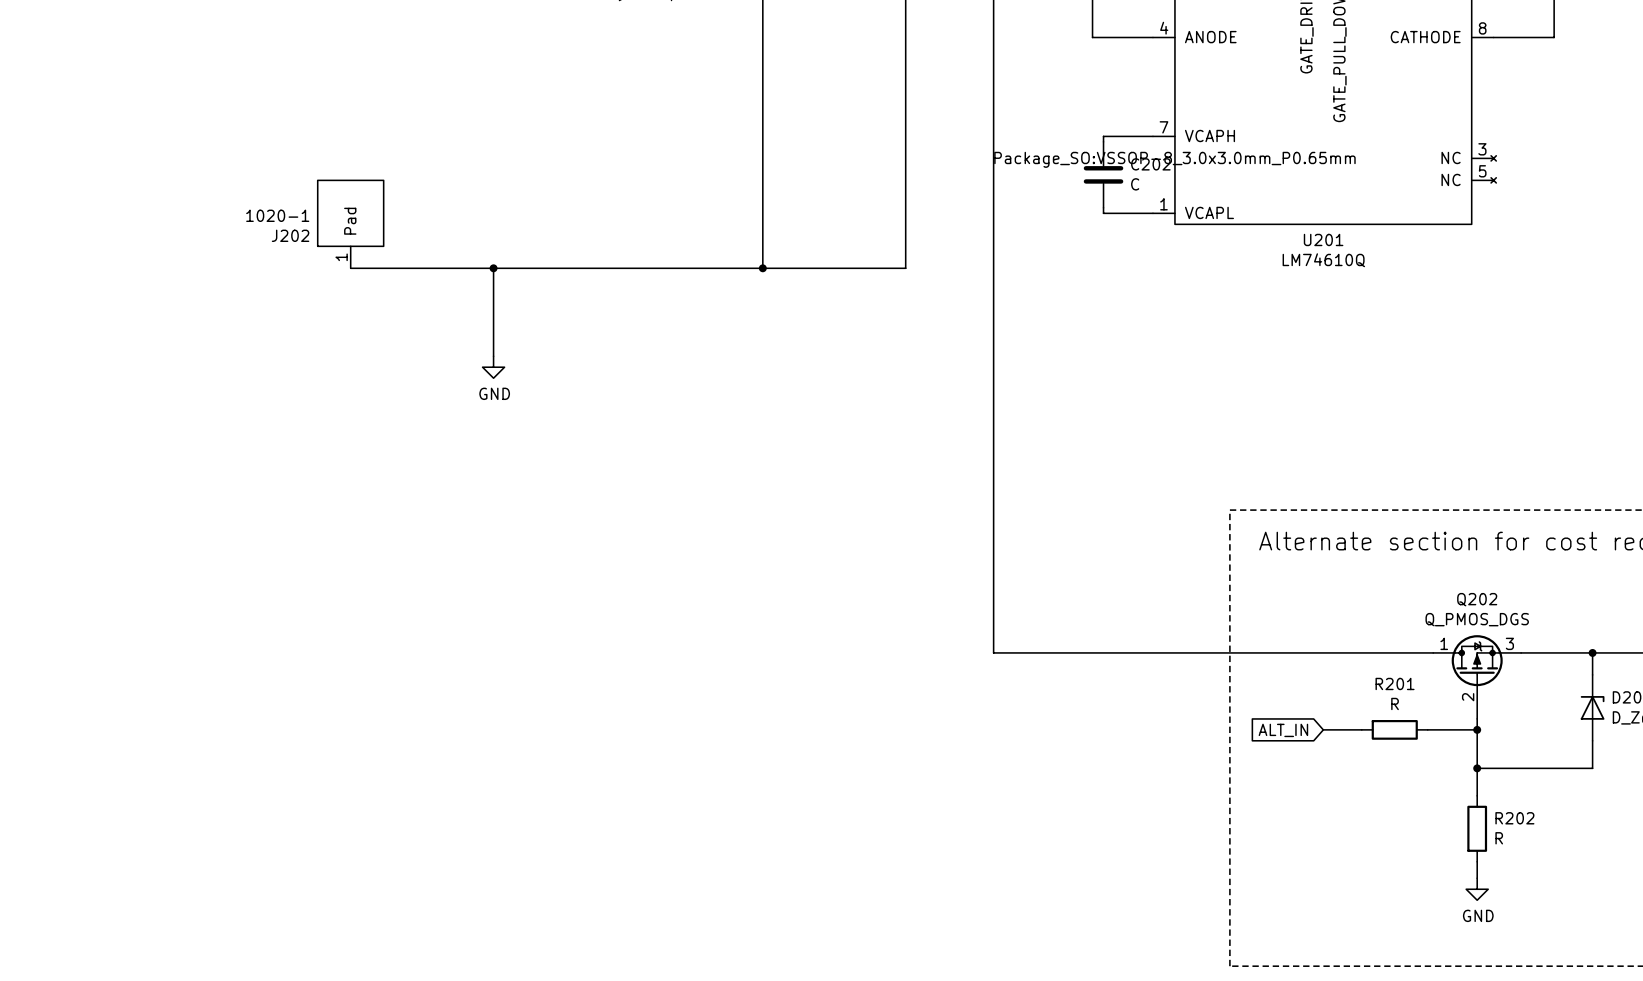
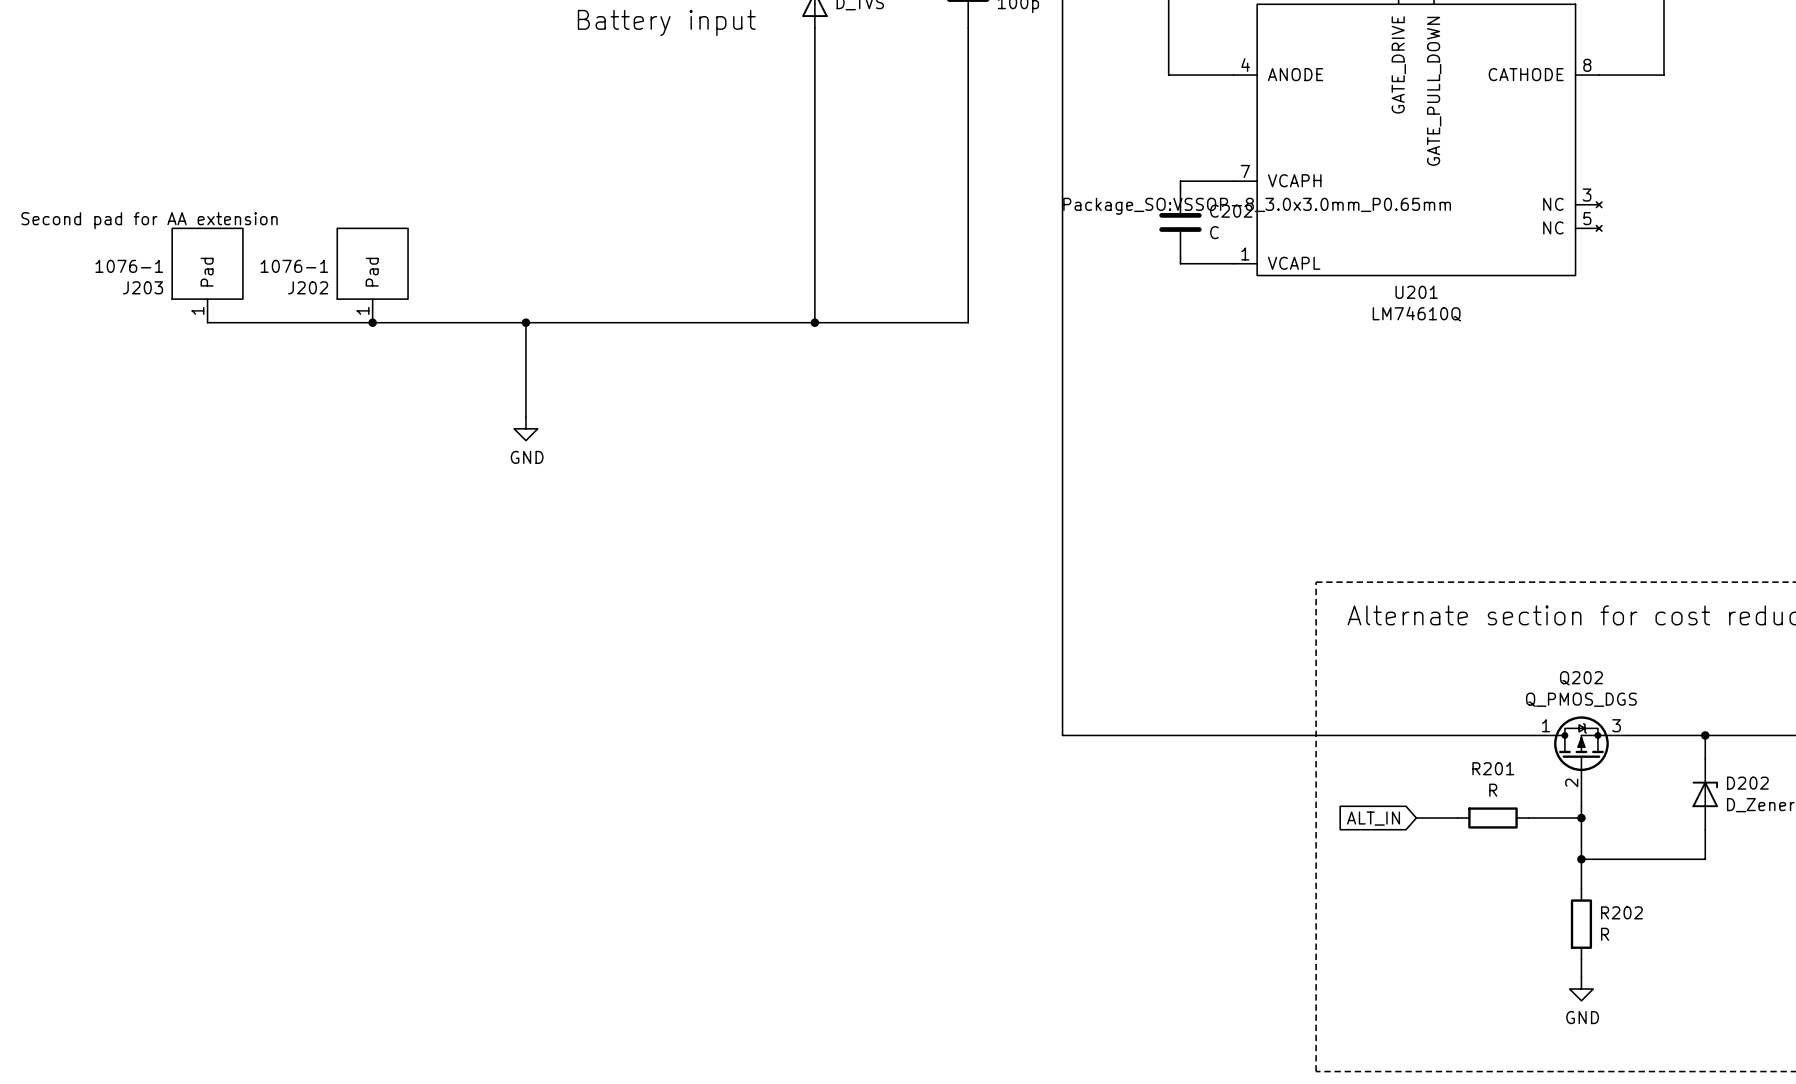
text: none -> Second pad for AA extension (149, 220)
J202 value: 1020-1 (277, 215) -> 1076-1 (294, 266)
J203: none -> 1076-1 (207, 275)
wire: none -> (207, 322) (372, 322)
junction: none -> (372, 322)

